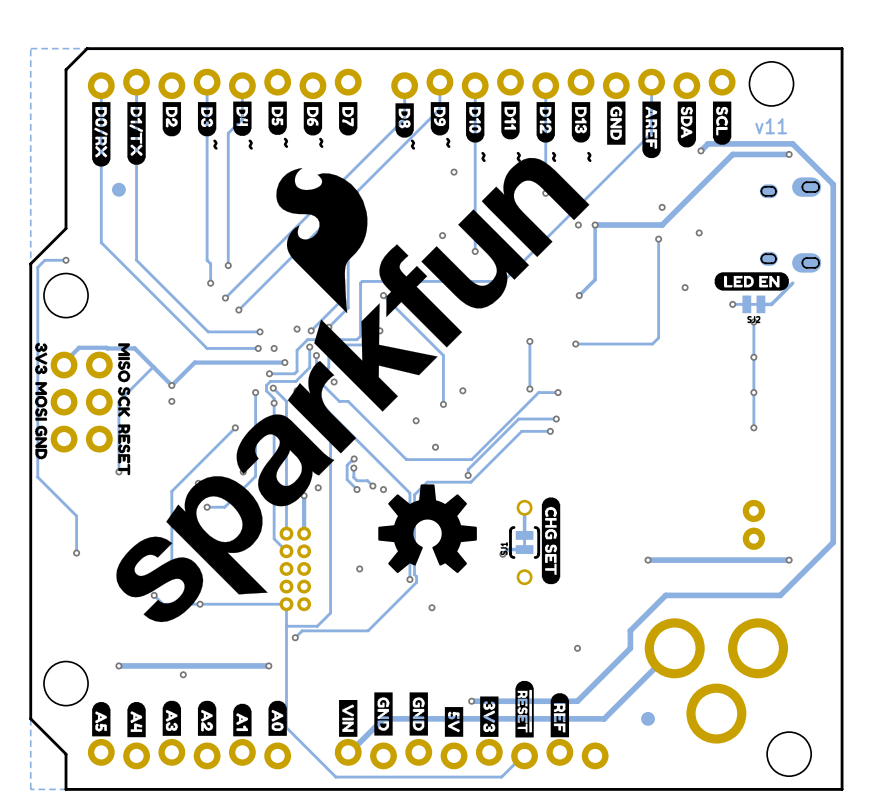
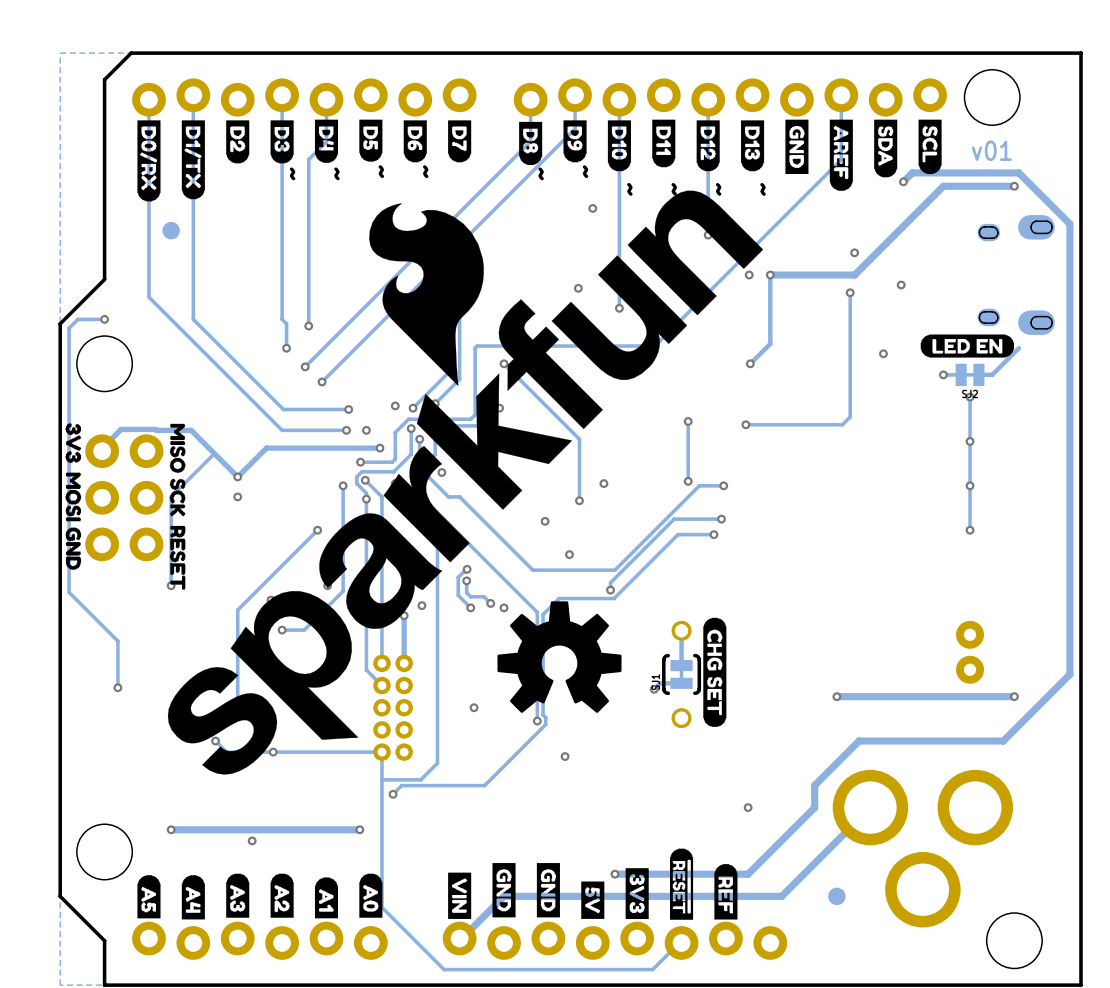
text: v11 (771, 126) -> v01 (991, 150)

